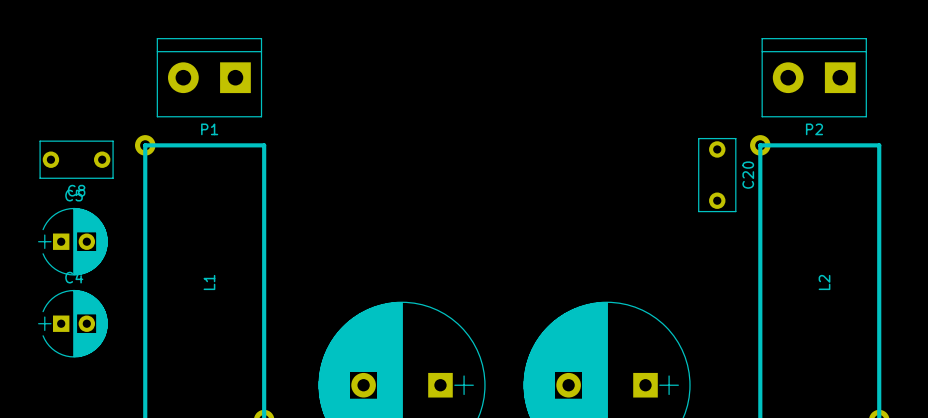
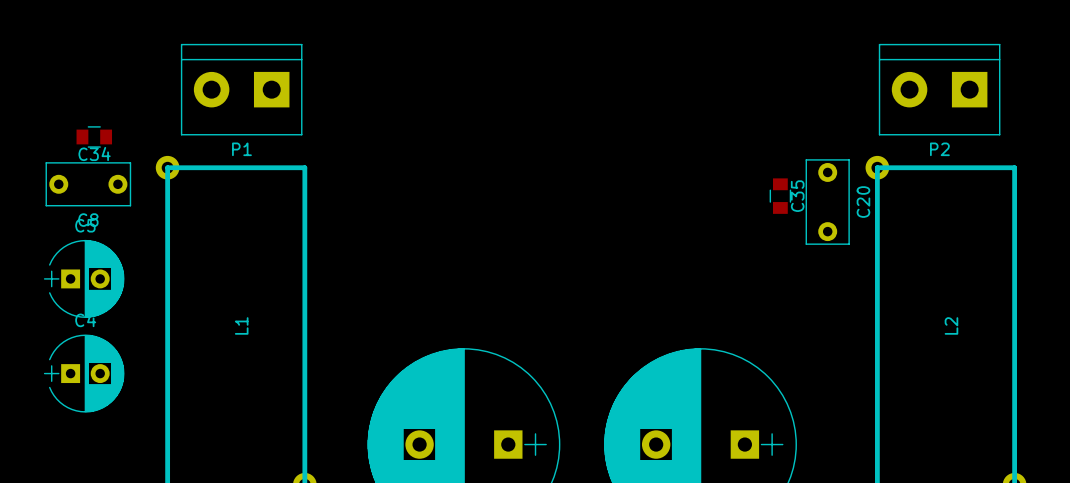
C34: none -> (94, 136)
C35: none -> (780, 196)

